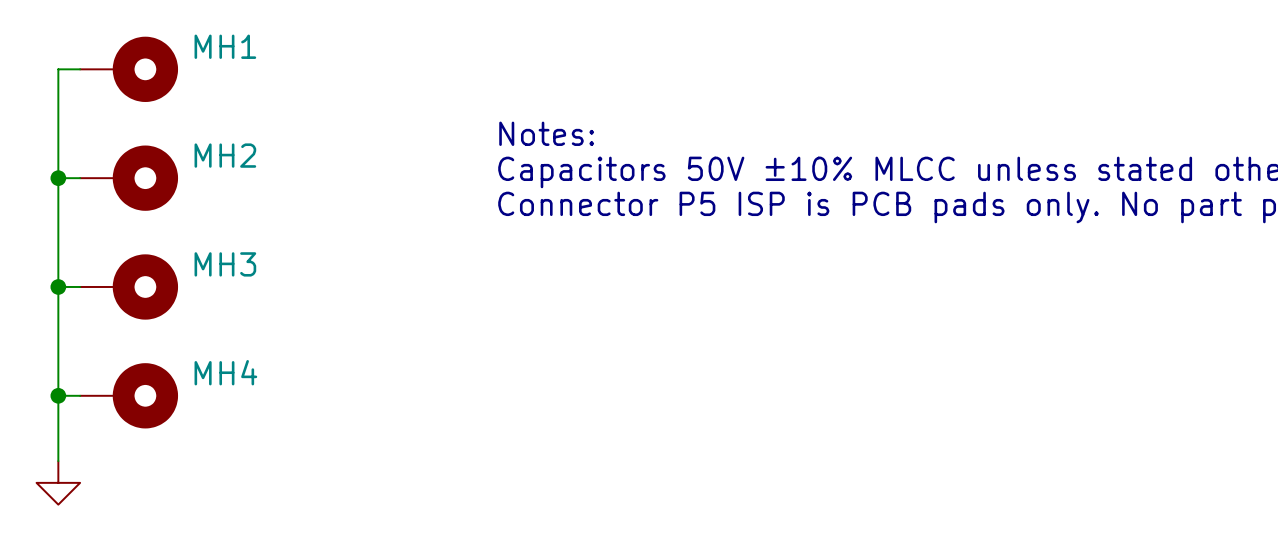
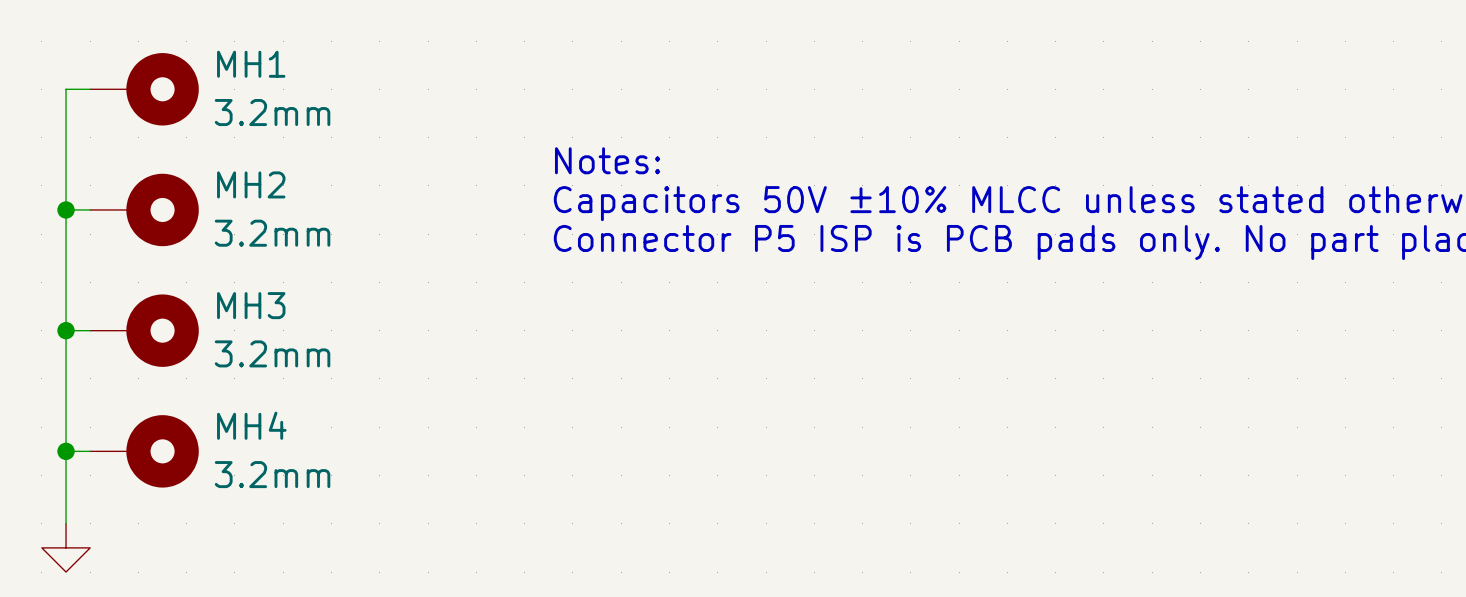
MH1 value: none -> 3.2mm (272, 112)
MH2 value: none -> 3.2mm (272, 233)
MH3 value: none -> 3.2mm (272, 353)
MH4 value: none -> 3.2mm (272, 474)

